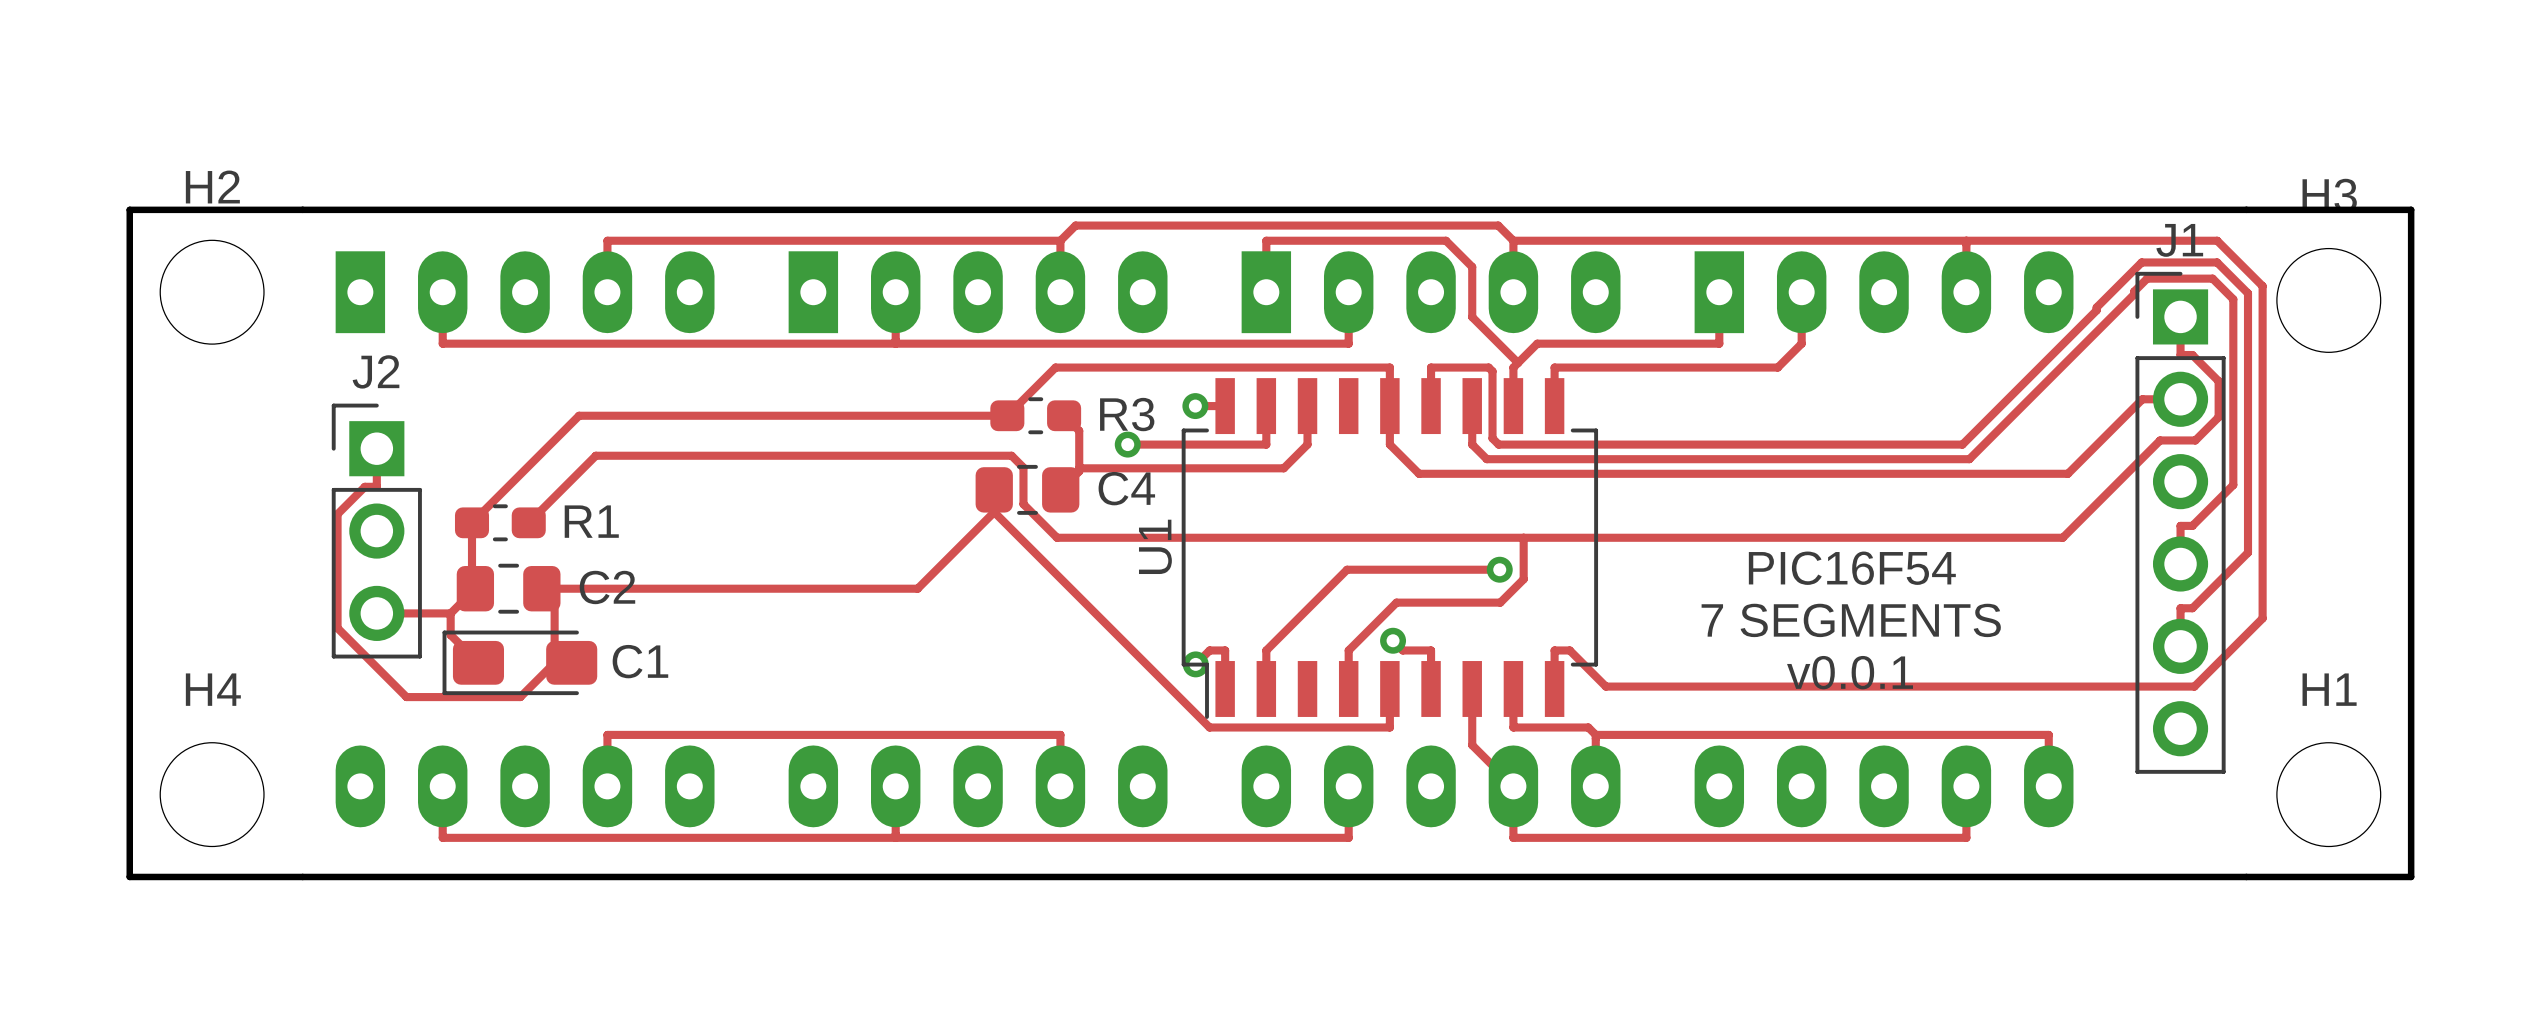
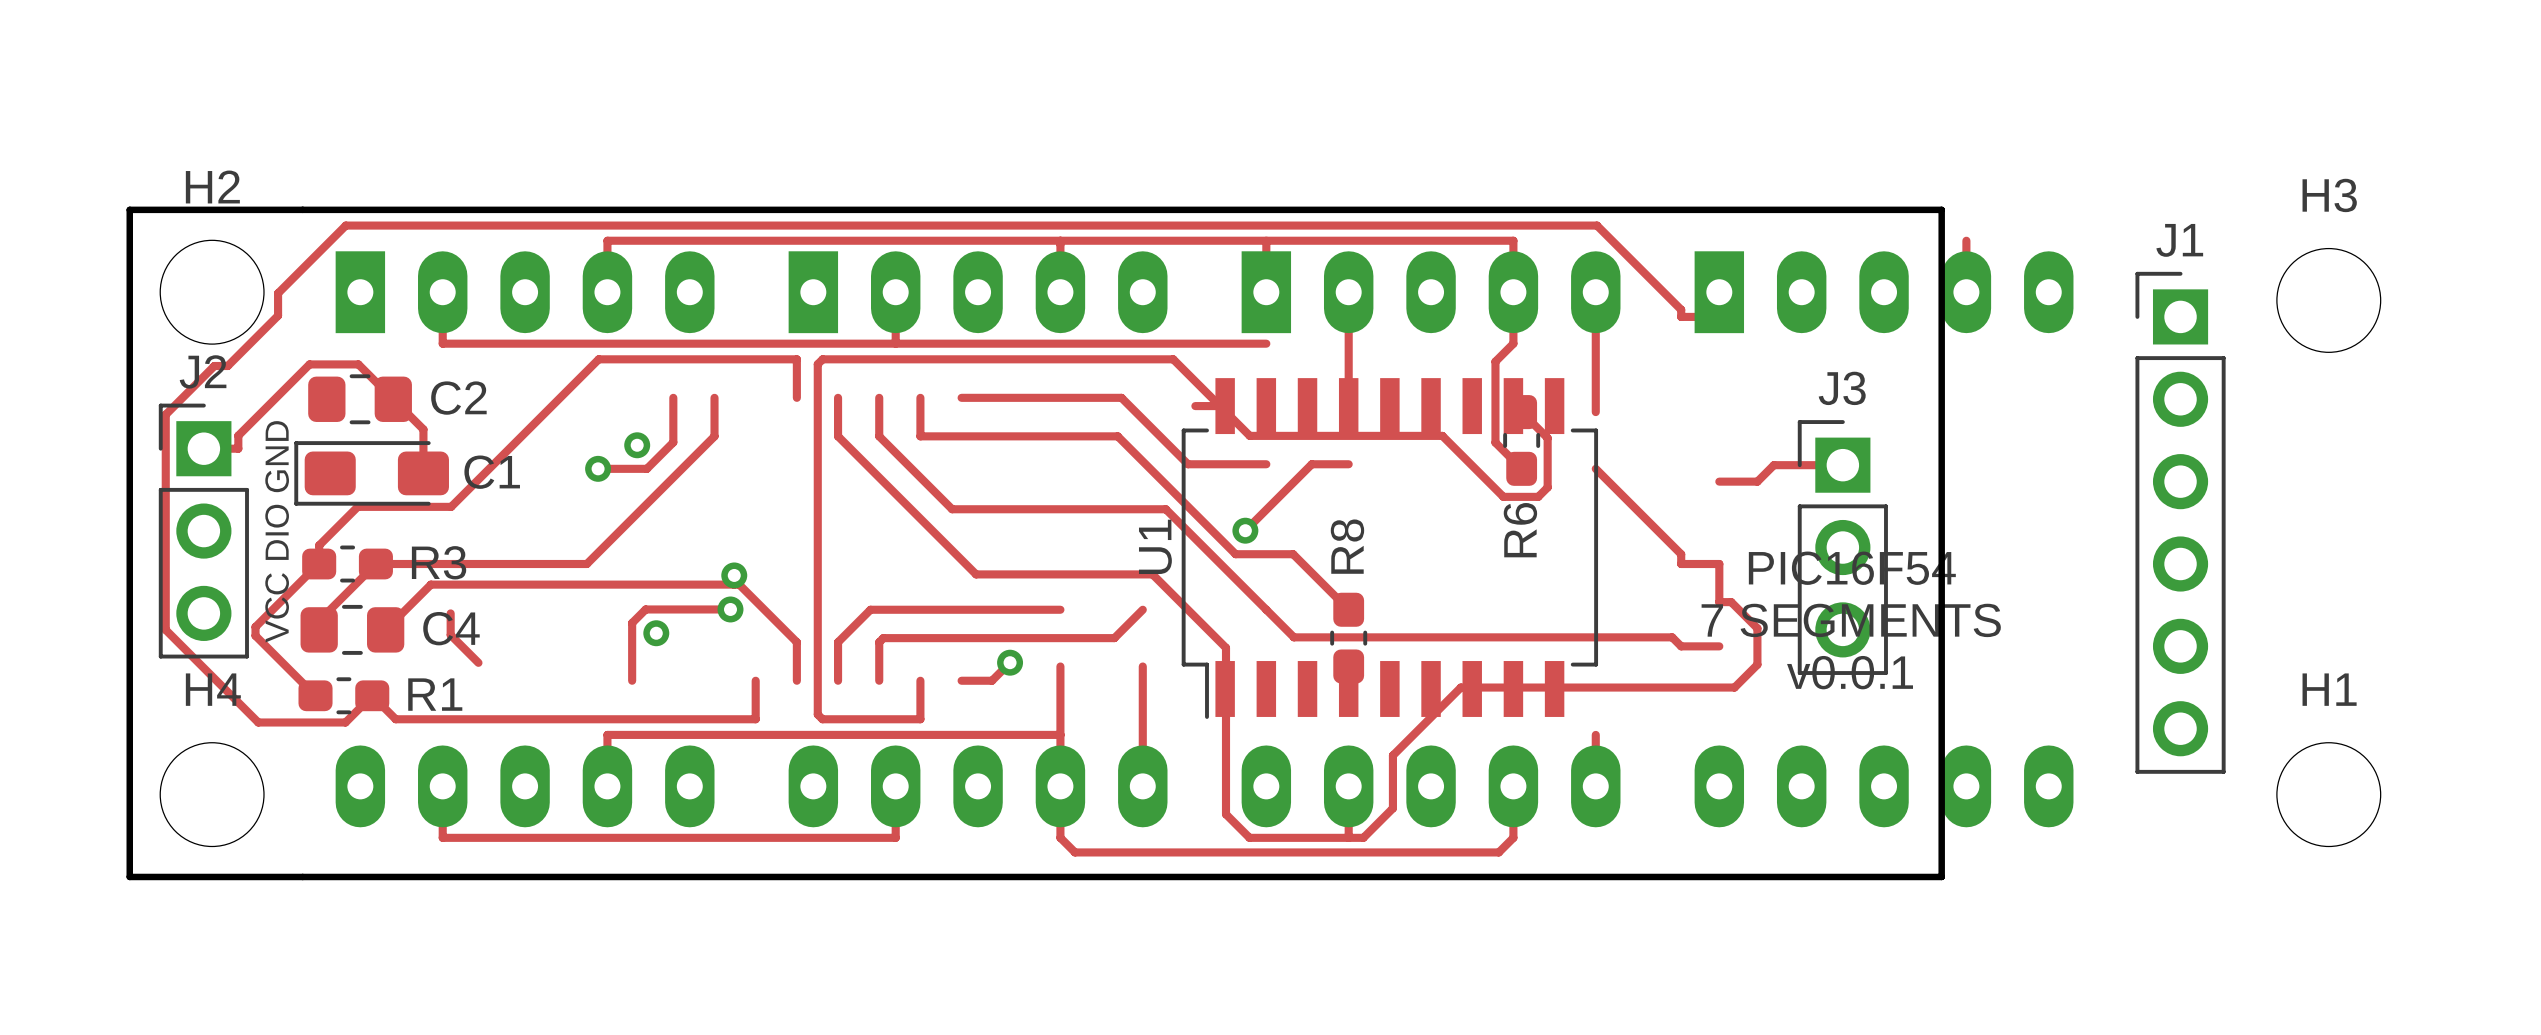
board edge: (1941, 209) (2411, 209) (2411, 876) (1941, 876) -> (1941, 209) (1941, 876)
track: (1075, 225) (1060, 240) -> (1266, 240) (1060, 240)
track: none -> (1075, 225) (345, 225) (278, 293) (278, 315) (227, 366) (214, 366) (165, 414) (165, 629) (258, 722) (345, 722) (372, 695) (395, 719) (755, 719) (755, 680)
track: (1498, 225) (1513, 240) (2217, 240) (2262, 286) (2262, 618) (2194, 686) (1605, 686) (1569, 650) (1554, 650) (1554, 688) -> (1498, 225) (1597, 225) (1681, 309) (1681, 316) (1719, 316)
track: (1445, 240) (1472, 266) (1472, 317) (1518, 362) -> (1445, 240) (1513, 240)
track: none -> (1513, 292) (1513, 343) (1495, 361) (1495, 442) (1521, 468)
track: none -> (1595, 292) (1595, 412)
track: (1719, 292) (1719, 343) (1537, 343) (1513, 367) (1513, 406) -> none
track: (1801, 292) (1801, 343) (1777, 367) (1554, 367) (1554, 406) -> none
track: (2180, 316) (2180, 355) (2192, 355) (2218, 381) (2218, 417) (2195, 440) (2160, 440) (2062, 537) (1057, 537) (1023, 504) (1023, 467) (1011, 455) (595, 455) (528, 522) -> none
track: (1266, 343) (1348, 343) -> (1348, 407) (1348, 343)
track: none -> (673, 397) (673, 442) (646, 468) (598, 468)
track: none -> (714, 397) (714, 436) (586, 564) (375, 564) (319, 620) (319, 629)
track: none -> (796, 397) (796, 359) (598, 359) (451, 506) (357, 506) (319, 545) (319, 564) (255, 626) (255, 635) (315, 695)
track: none -> (879, 397) (879, 436) (952, 509) (1165, 509) (1293, 637) (1672, 637) (1681, 646) (1719, 646)
track: none -> (920, 397) (920, 436) (1117, 436) (1235, 554) (1293, 554) (1348, 609)
track: none -> (961, 397) (1121, 397) (1187, 464) (1266, 464)
track: (2180, 399) (2142, 399) (2067, 473) (1419, 473) (1389, 444) (1389, 367) (1055, 367) (1007, 415) (579, 415) (472, 522) (472, 585) (475, 588) (450, 613) (376, 613) -> none
via: (1195, 406) -> none
track: (1307, 406) (1307, 444) (1283, 468) (1079, 468) -> none
track: (1431, 406) (1431, 367) (1488, 367) (1492, 371) (1492, 438) (1498, 444) (1962, 444) (2096, 310) (2096, 307) (2141, 262) (2217, 262) (2248, 293) (2248, 552) (2192, 608) (2180, 608) (2180, 646) -> none
track: (1472, 406) (1472, 444) (1486, 459) (1969, 459) (2134, 294) (2134, 291) (2147, 278) (2212, 278) (2233, 299) (2233, 485) (2192, 525) (2180, 525) (2180, 564) -> none
track: (1266, 407) (1266, 444) (1127, 444) -> none
track: none -> (1521, 412) (1547, 438) (1547, 487) (1538, 496) (1503, 496) (1442, 435) (1249, 435) (1173, 359) (822, 359) (817, 364) (817, 714) (822, 719) (920, 719) (920, 680)
R3 position: (1035, 415) -> (347, 564)
track: (1064, 415) (1079, 430) (1079, 471) (1060, 489) -> none
R6: none -> (1521, 440)
via: (1127, 444) -> none
via: none -> (637, 445)
track: none -> (203, 448) (238, 448) (238, 435) (309, 364) (358, 364) (423, 429) (423, 473)
track: (376, 448) (376, 486) (364, 486) (337, 514) (337, 628) (406, 697) (520, 697) (554, 662) -> none
track: none -> (1348, 464) (1311, 464) (1245, 530)
track: none -> (1842, 465) (1773, 465) (1757, 481) (1719, 481)
via: none -> (598, 468)
track: none -> (1595, 468) (1681, 554) (1681, 564) (1719, 564) (1719, 602) (1731, 602) (1757, 628) (1757, 664) (1734, 687) (1460, 687) (1392, 755) (1392, 808) (1363, 837) (1348, 837)
C4 position: (1027, 489) -> (352, 629)
track: (994, 512) (1209, 727) (1389, 727) (1389, 688) -> none
track: (994, 512) (917, 588) (541, 588) (554, 601) (554, 662) -> none
R1 position: (500, 522) -> (343, 695)
via: none -> (1245, 530)
text: none -> VCC DIO GND (277, 531)
J2 position: (376, 531) -> (203, 531)
track: (1523, 537) (1523, 579) (1500, 602) (1396, 602) (1348, 650) (1348, 666) -> none
J3: none -> (1842, 547)
track: (1499, 569) (1347, 569) (1266, 650) (1266, 666) -> none
via: (1499, 569) -> none
via: none -> (734, 575)
C2 position: (508, 588) -> (360, 399)
track: none -> (730, 609) (645, 609) (632, 623) (632, 680)
via: none -> (730, 609)
track: none -> (1060, 609) (870, 609) (838, 642) (838, 680)
track: none -> (1142, 609) (1114, 638) (883, 638) (879, 642) (879, 680)
track: none -> (385, 629) (430, 584) (739, 584) (796, 642) (796, 680)
via: none -> (656, 633)
R8: none -> (1348, 638)
track: (1393, 640) (1402, 650) (1431, 650) (1431, 688) -> none
via: (1393, 640) -> none
C1 position: (519, 662) -> (371, 473)
track: none -> (1010, 662) (992, 680) (961, 680)
via: none -> (1010, 662)
track: (1195, 664) (1209, 650) (1225, 650) (1225, 688) -> none
via: (1195, 664) -> none
track: none -> (1060, 666) (1060, 734)
track: none -> (1142, 666) (1142, 786)
track: (1472, 688) (1472, 745) (1513, 786) -> none
track: (1513, 688) (1513, 727) (1588, 727) (1595, 734) (2048, 734) (2048, 786) -> none
track: (1966, 786) (1966, 837) (1513, 837) -> (1060, 786) (1060, 837) (1075, 852) (1498, 852) (1513, 837)
track: (895, 837) (1249, 837) -> (838, 397) (838, 436) (976, 574) (1152, 574) (1226, 647) (1226, 814) (1249, 837)

